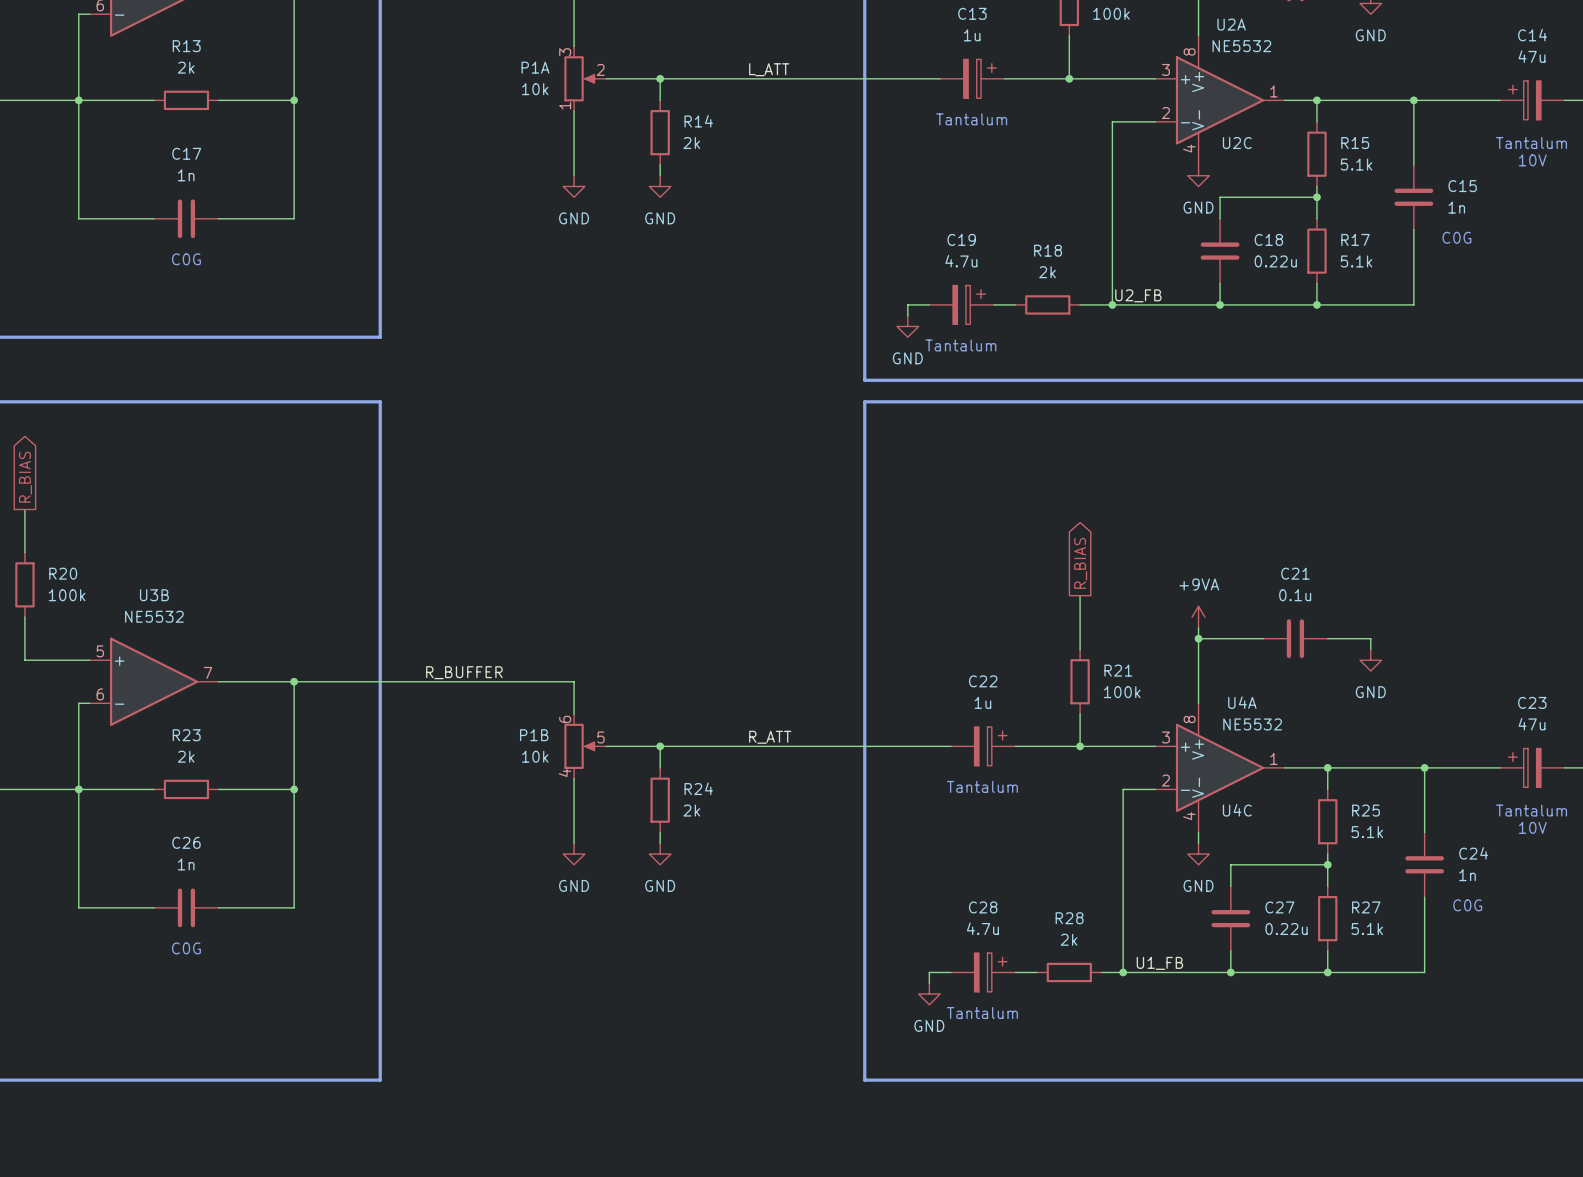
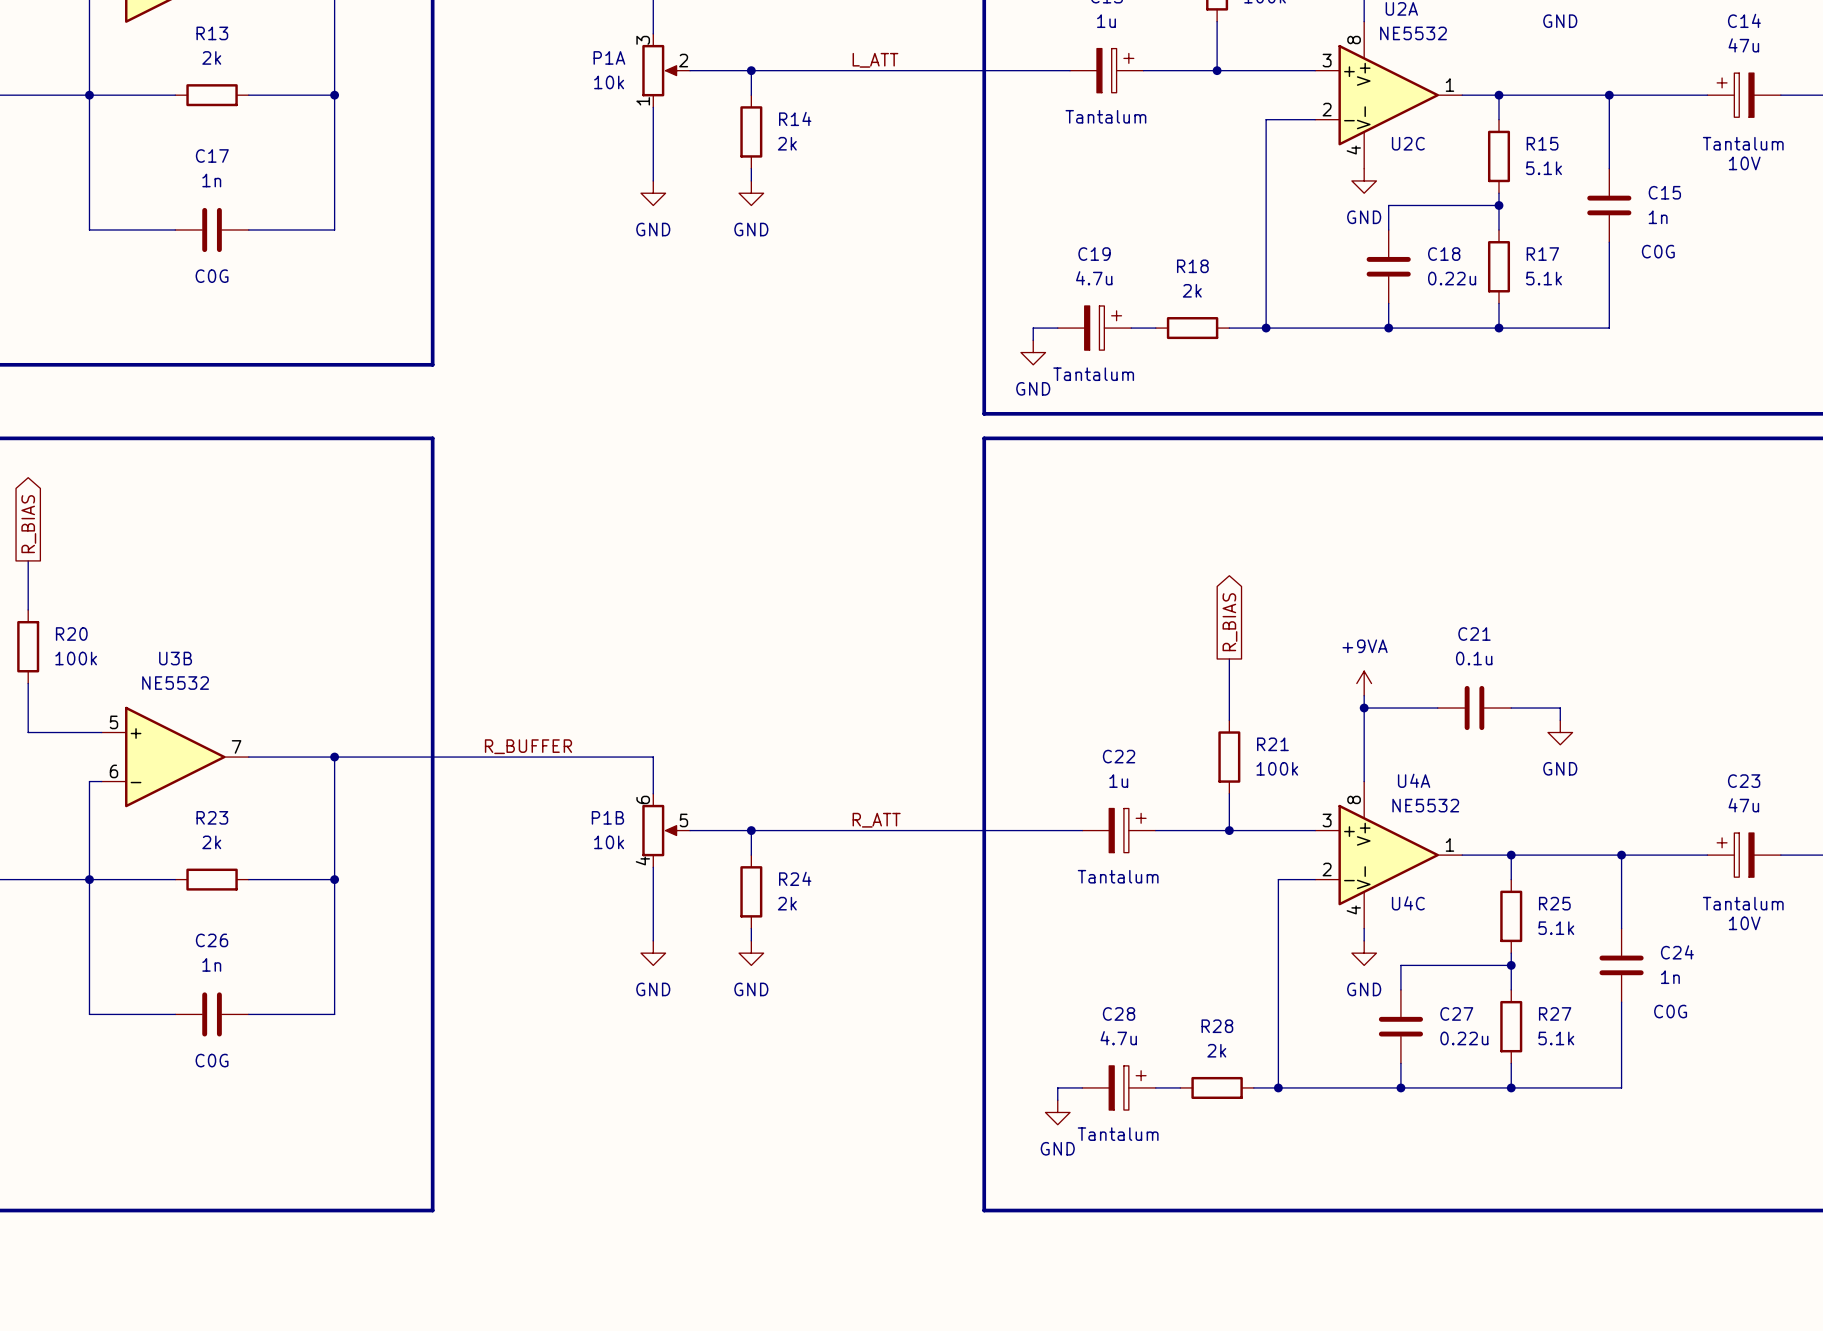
label: U2_FB (1138, 295) -> none
label: U1_FB (1159, 963) -> none

